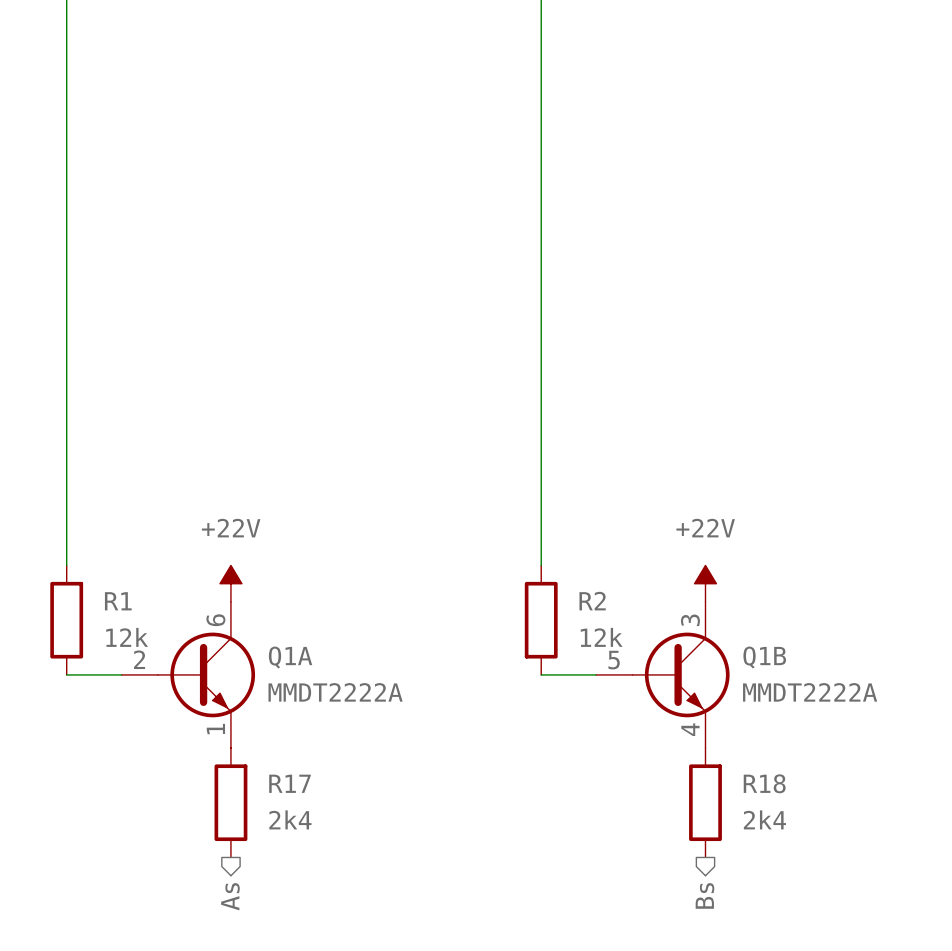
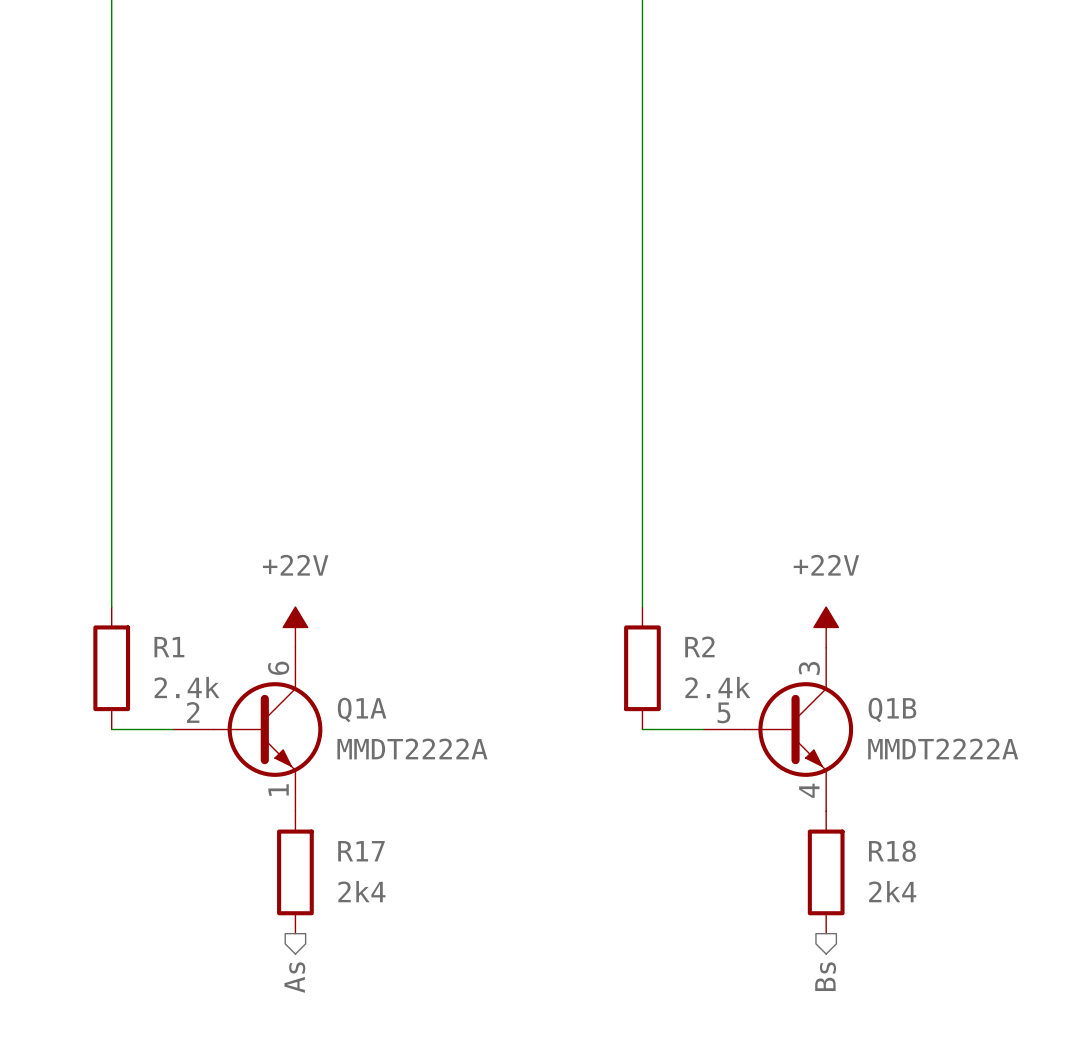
R1 value: 12k (127, 637) -> 2.4k (187, 687)
R2 value: 12k (601, 637) -> 2.4k (717, 687)

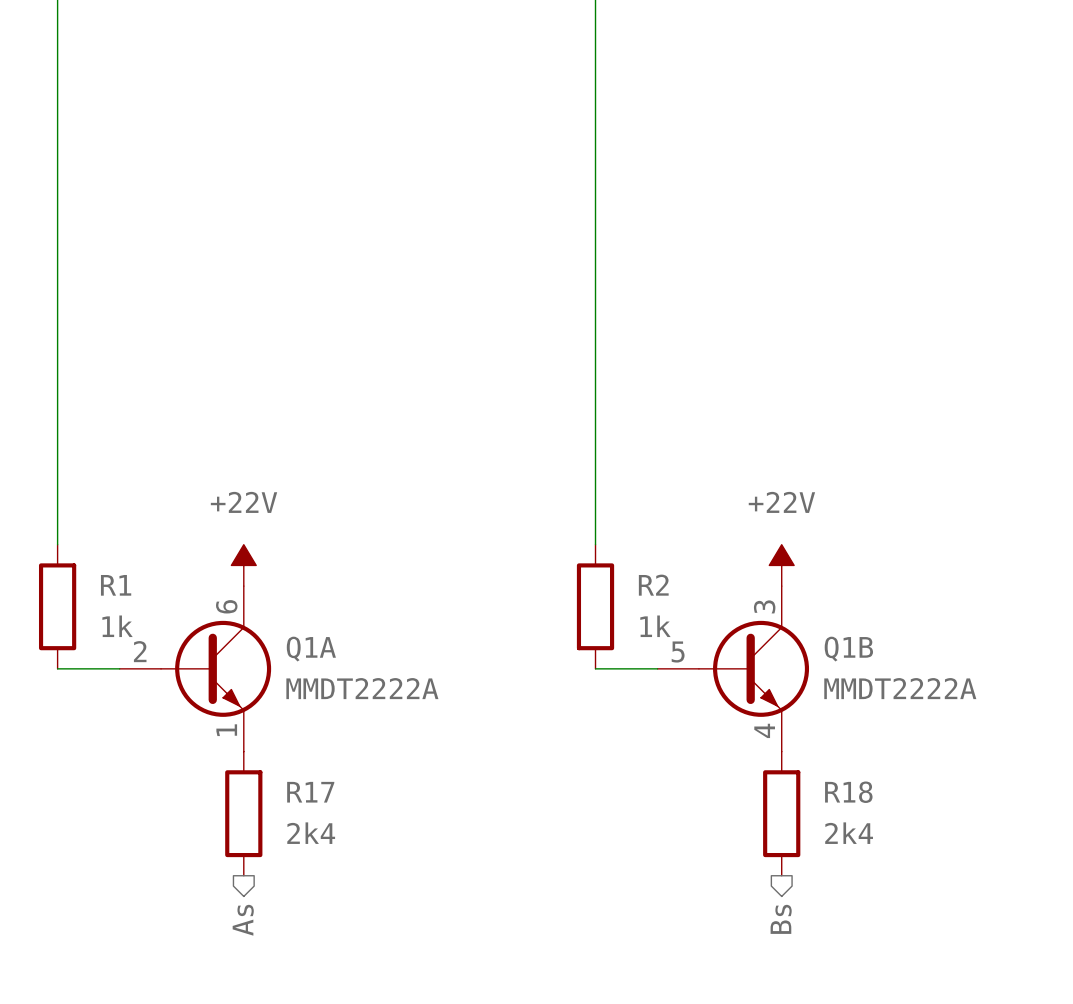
R1 value: 2.4k (187, 687) -> 1k (117, 626)
R2 value: 2.4k (717, 687) -> 1k (655, 626)

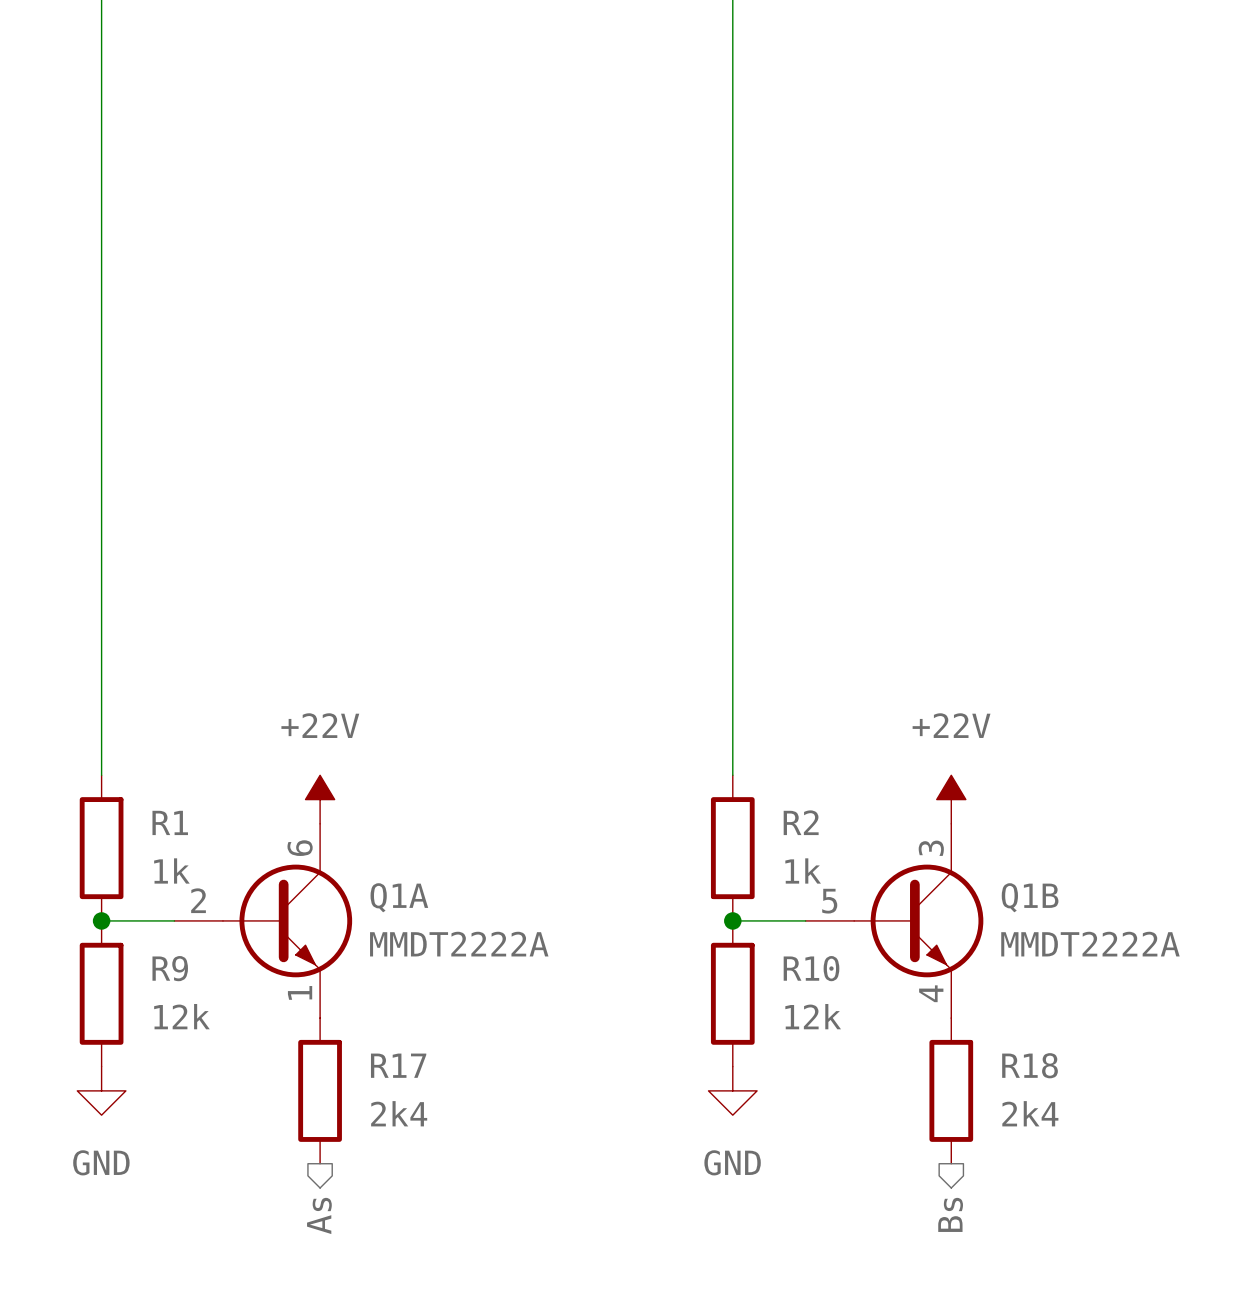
junction: none -> (101, 920)
junction: none -> (732, 920)
R9: none -> 12k (101, 993)
R10: none -> 12k (732, 993)
power symbol: none -> GND (101, 1090)
power symbol: none -> GND (732, 1090)

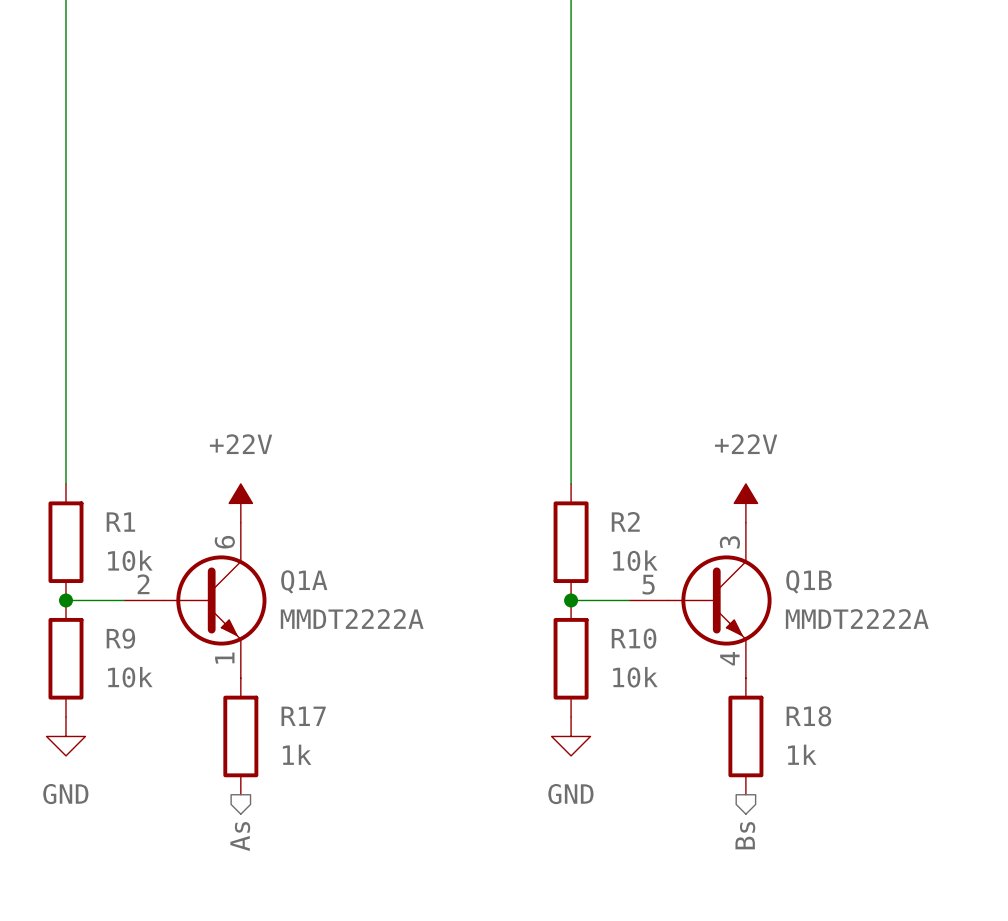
R1 value: 1k (171, 870) -> 10k (130, 560)
R2 value: 1k (803, 870) -> 10k (635, 560)
R9 value: 12k (181, 1016) -> 10k (130, 677)
R10 value: 12k (813, 1016) -> 10k (635, 677)
R17 value: 2k4 (399, 1113) -> 1k (297, 754)
R18 value: 2k4 (1030, 1113) -> 1k (802, 754)

